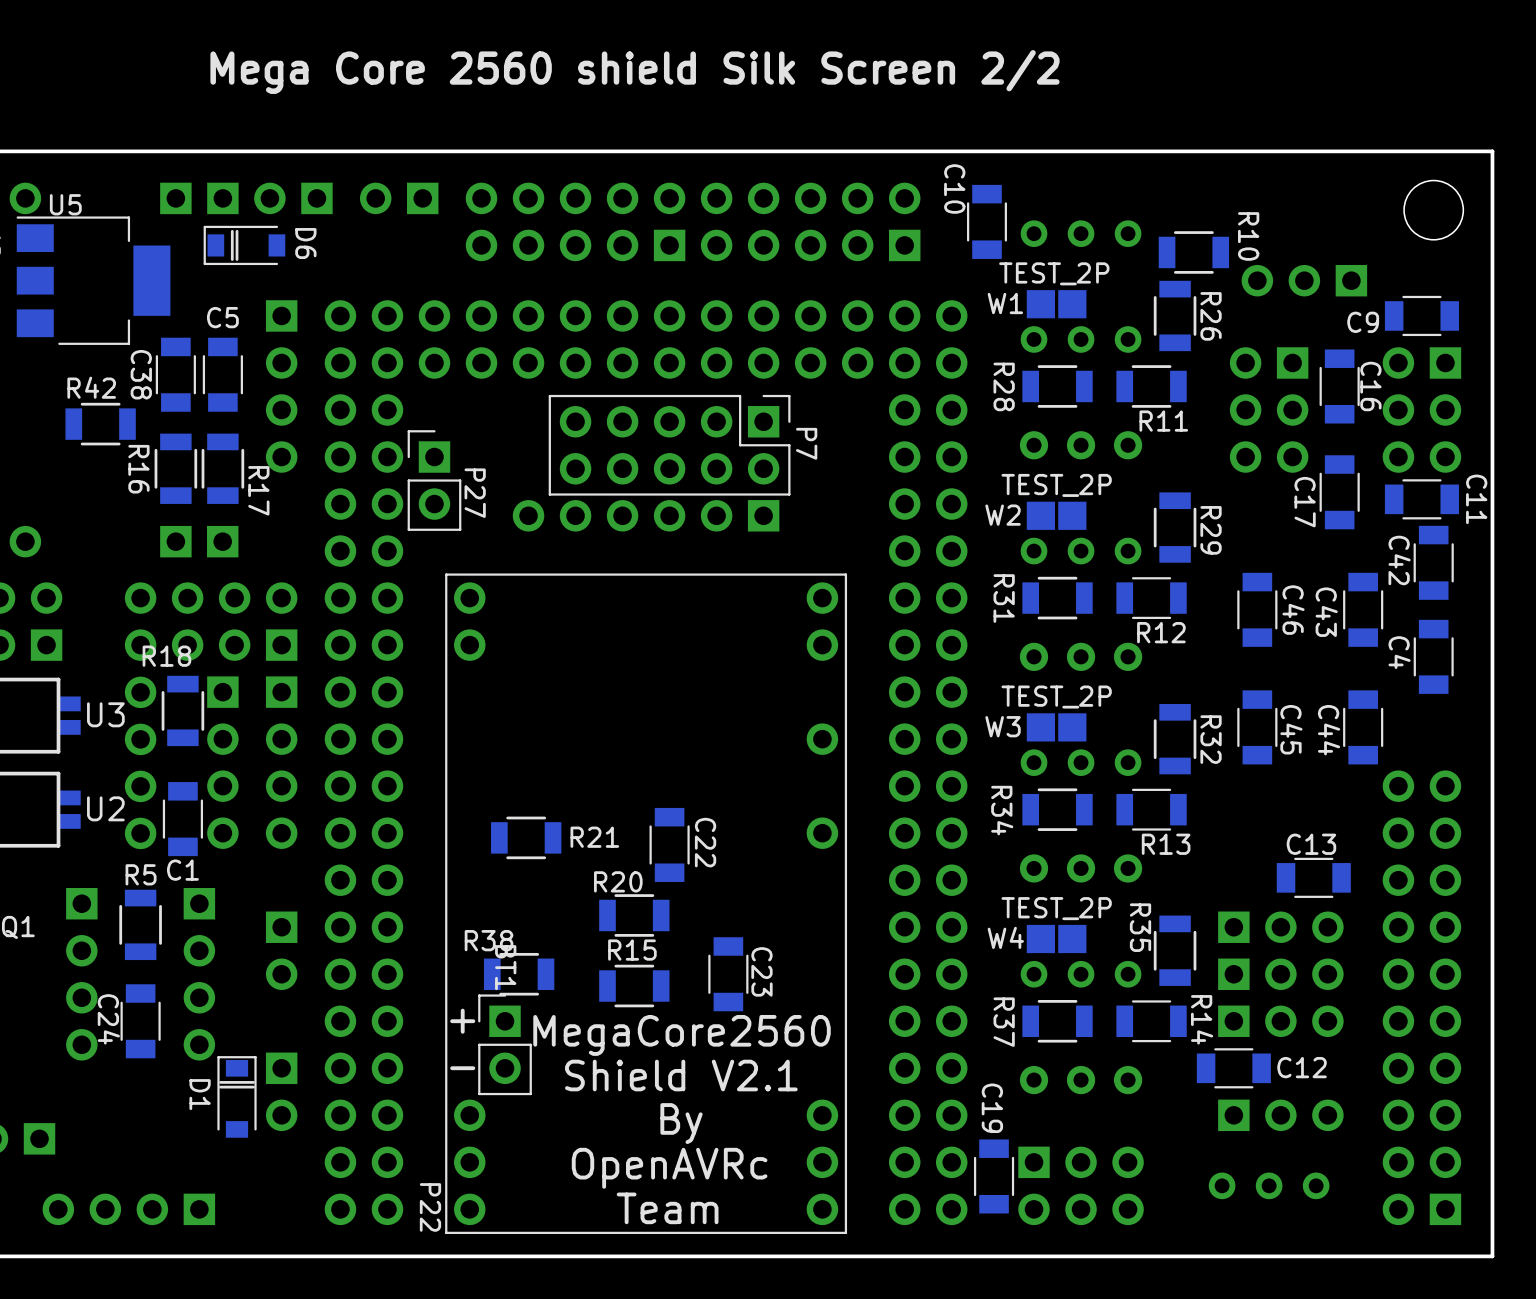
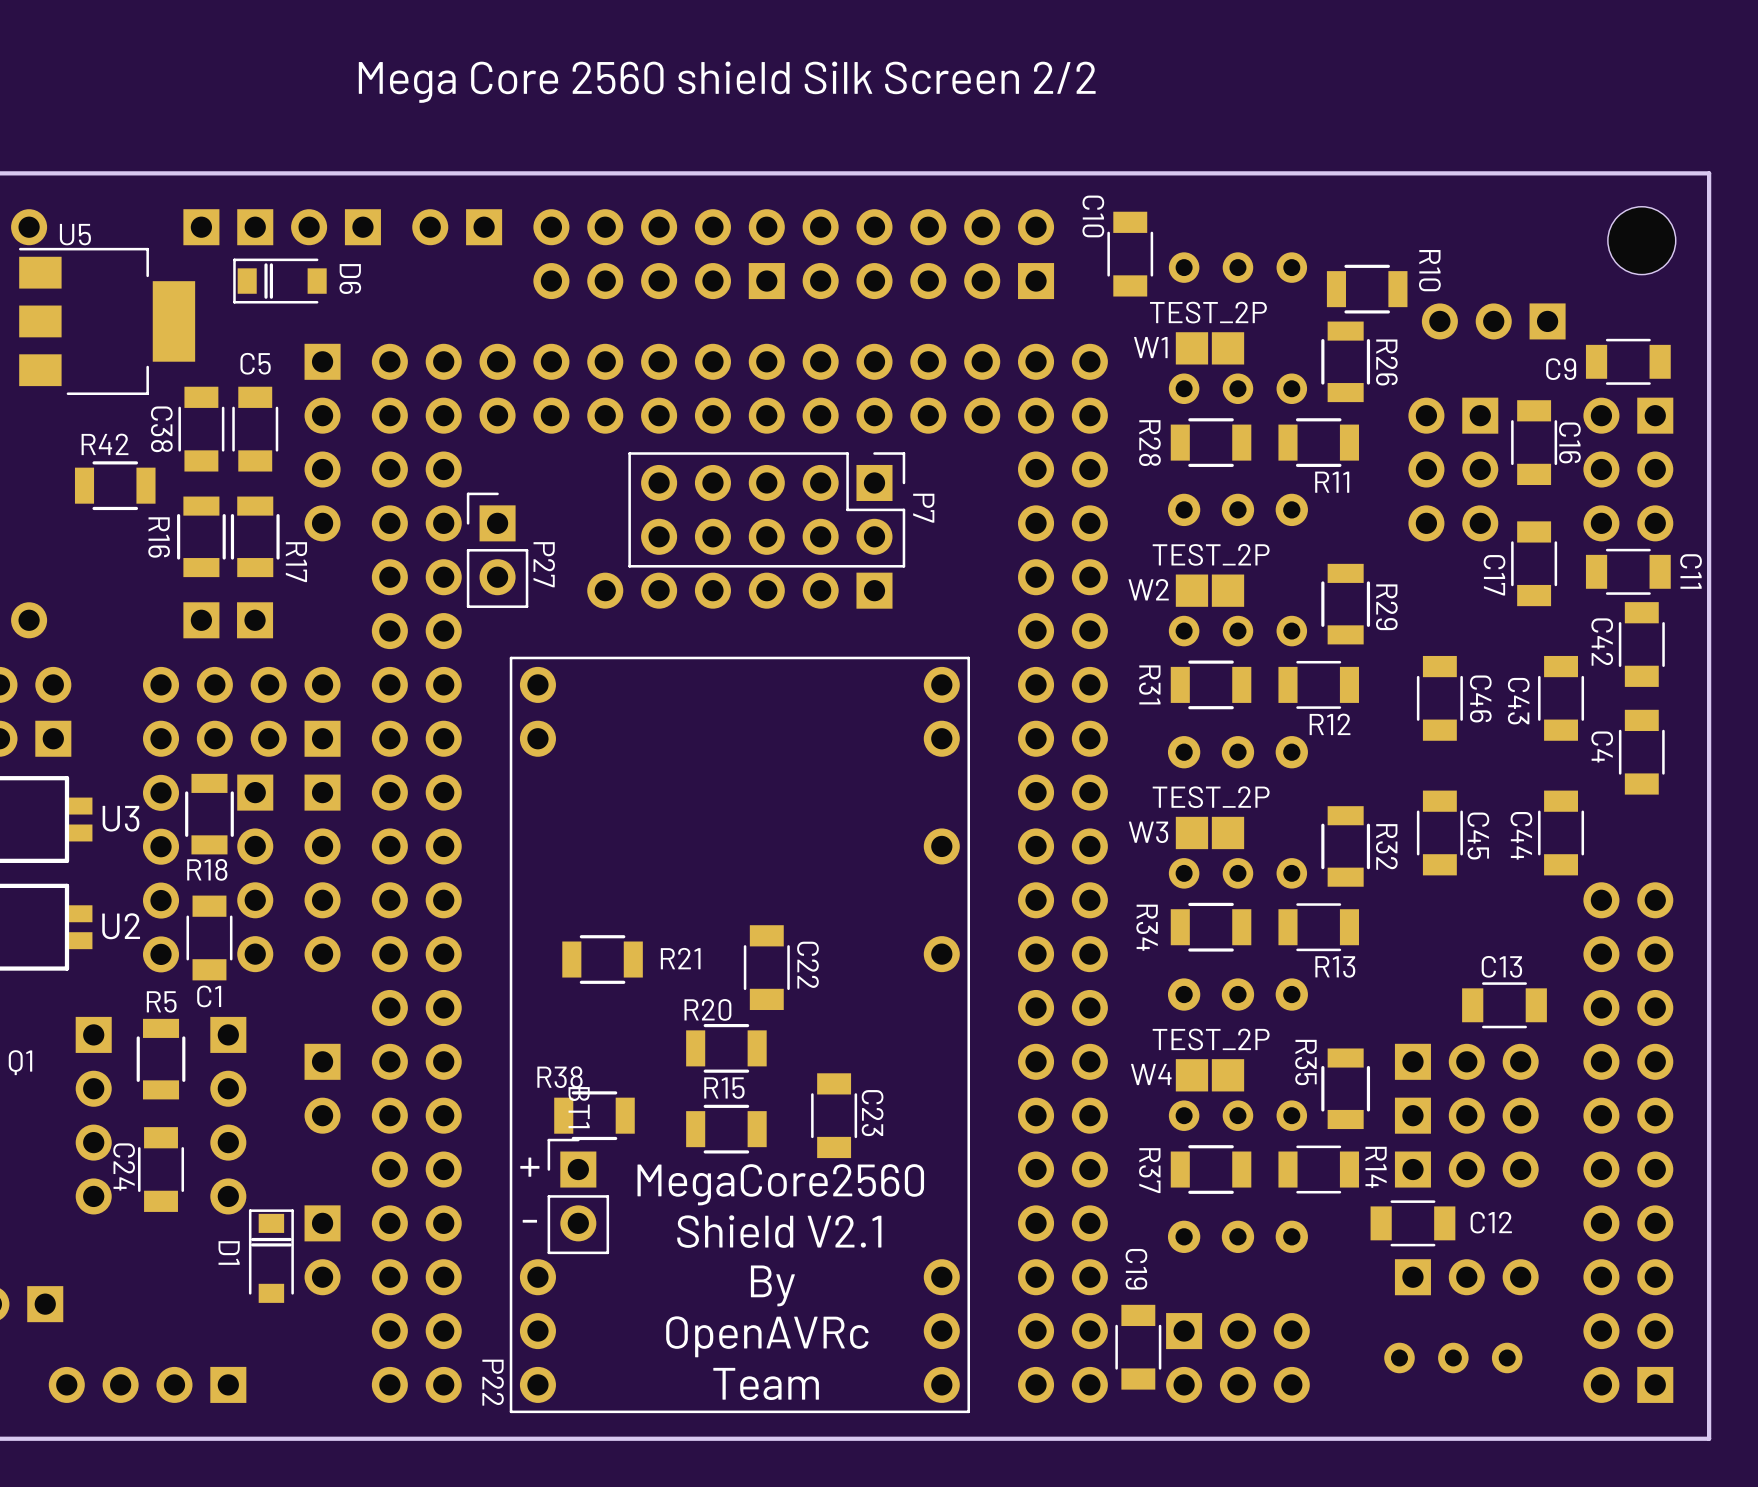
R18 name position: R18 (166, 656) -> R18 (207, 869)

